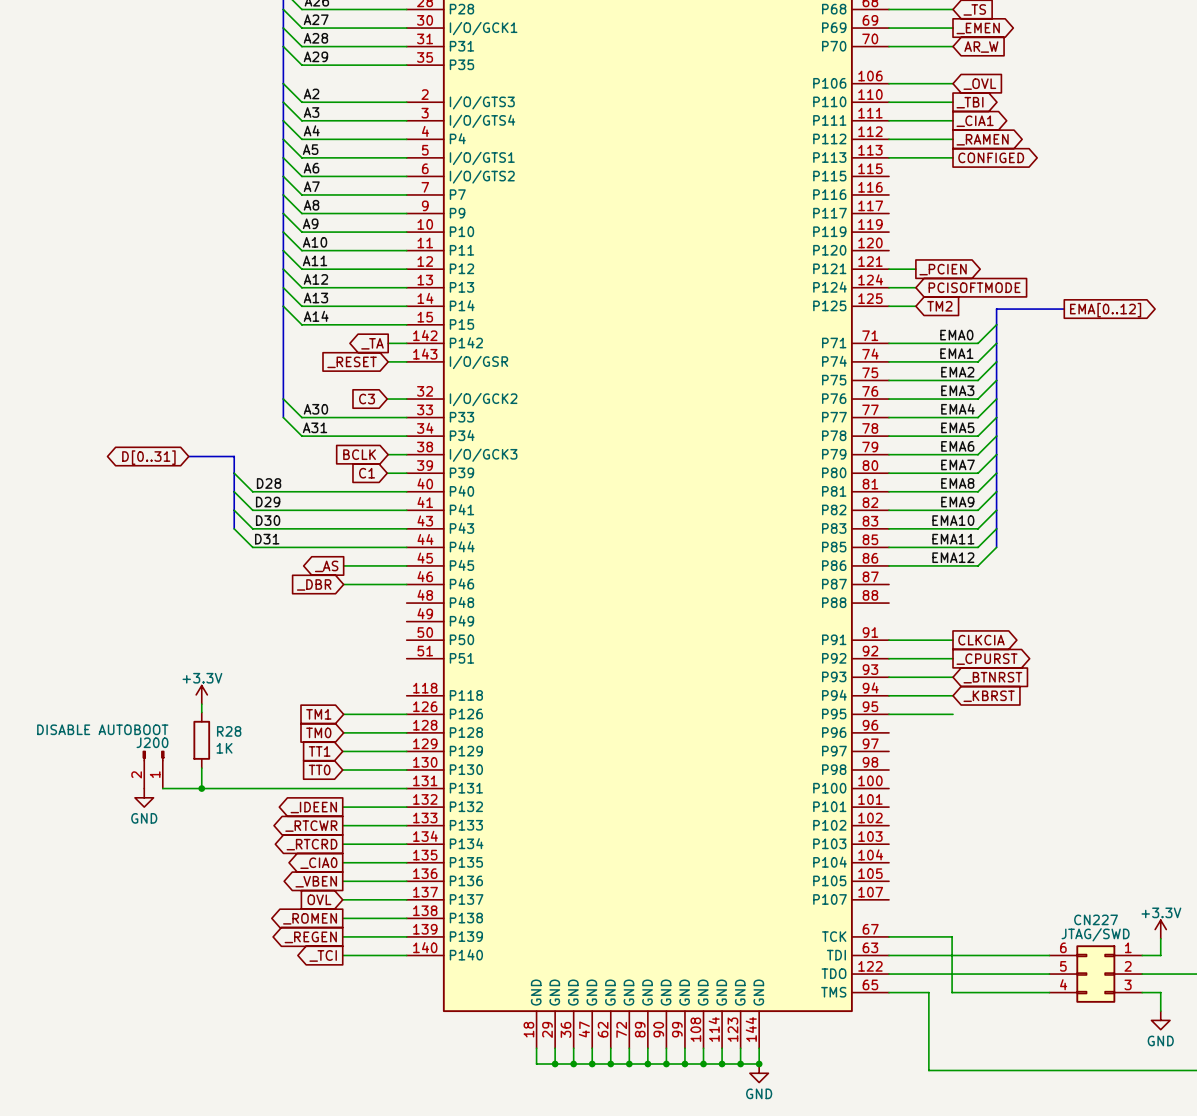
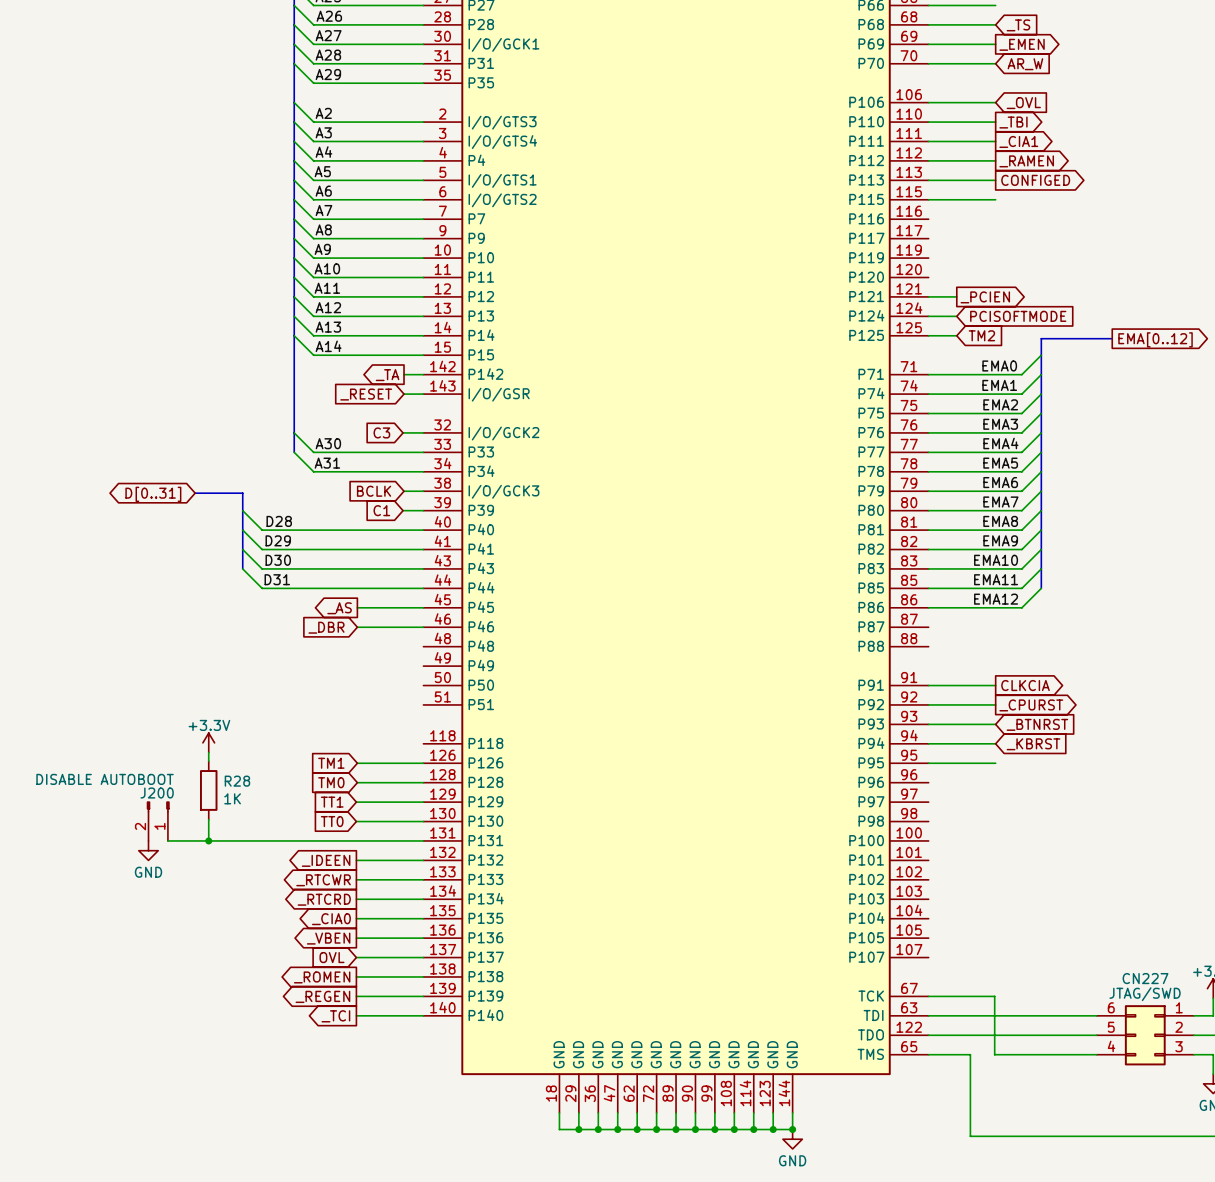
wire: none -> (928, 199) (995, 199)

